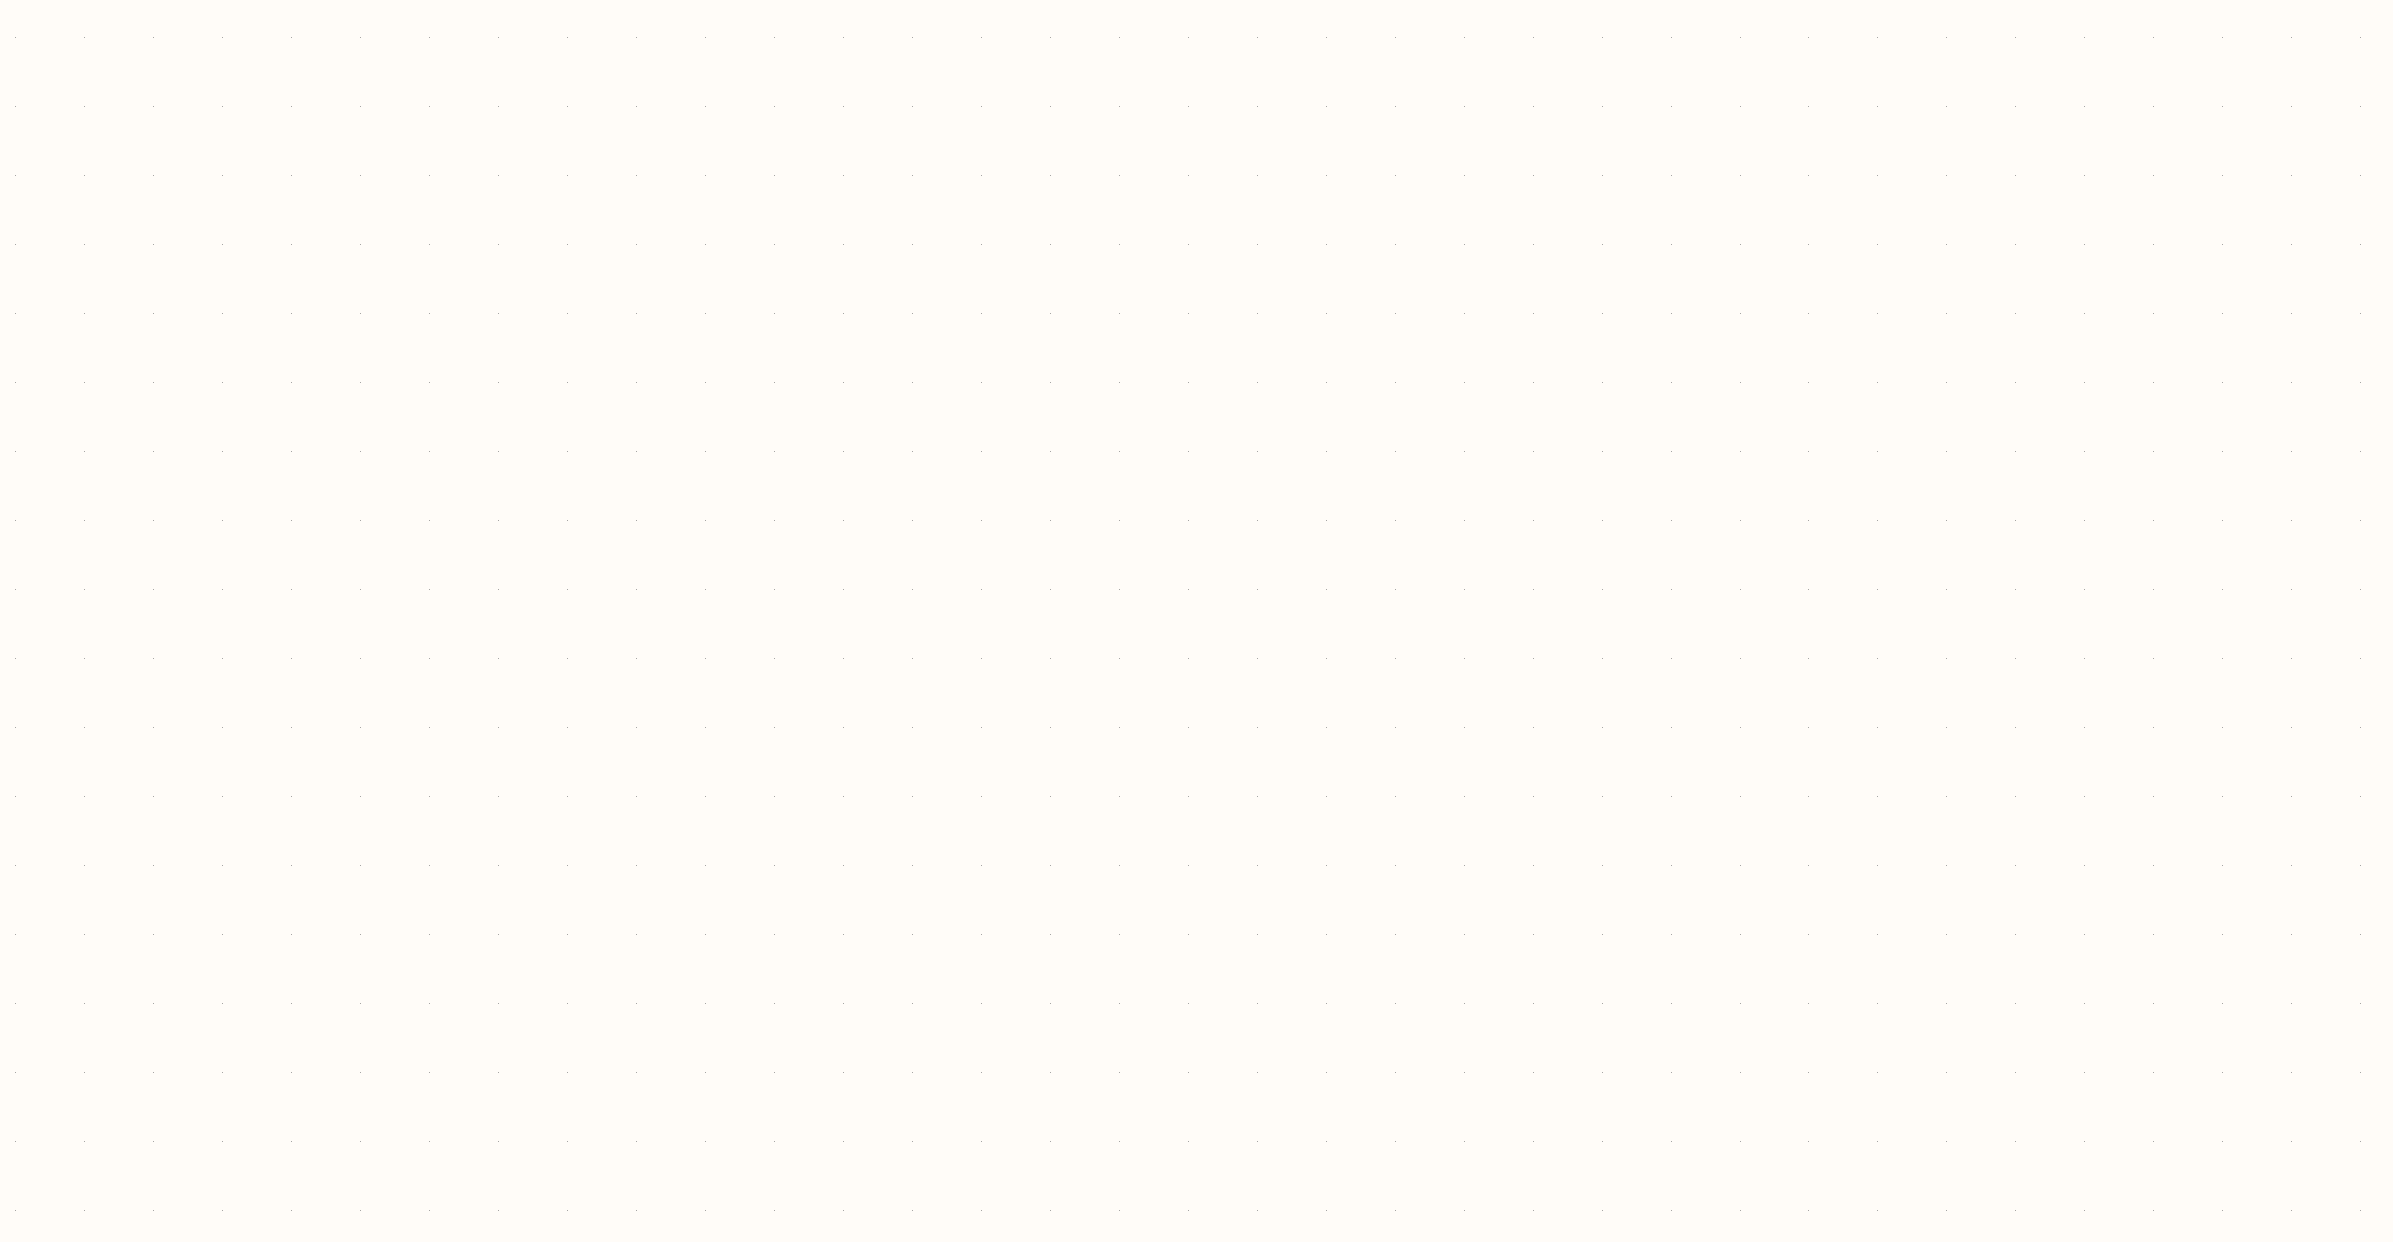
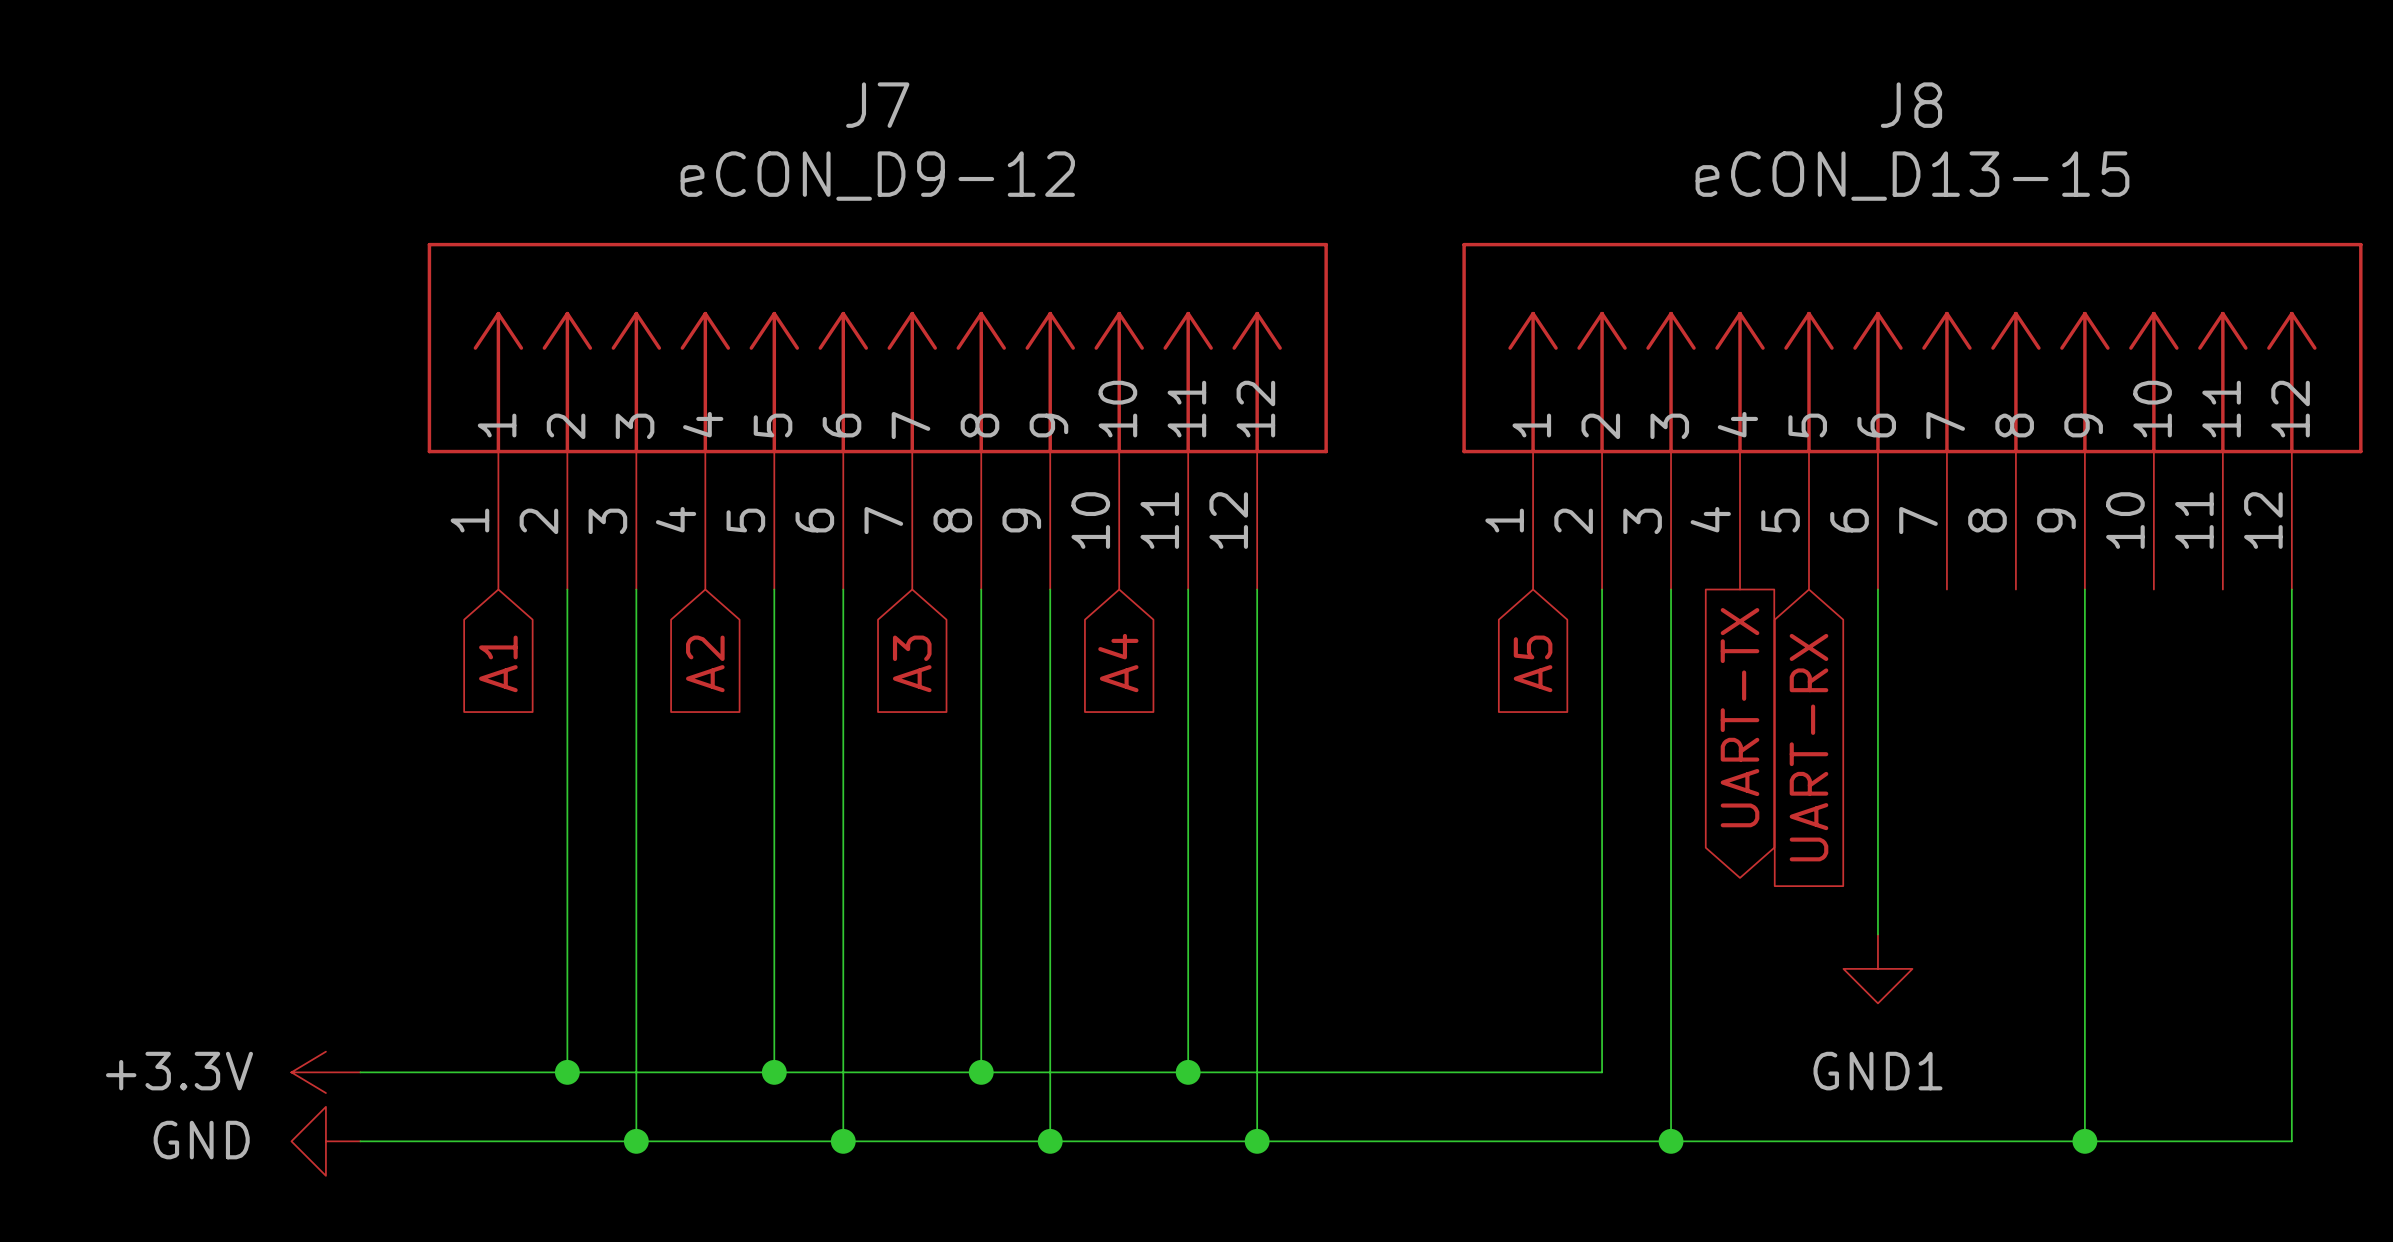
J7: none -> eCON_D9-12 (877, 416)
J8: none -> eCON_D13-15 (1912, 416)
wire: none -> (567, 589) (567, 1072)
wire: none -> (636, 589) (636, 1141)
wire: none -> (774, 589) (774, 1072)
wire: none -> (843, 589) (843, 1141)
wire: none -> (981, 589) (981, 1072)
wire: none -> (1050, 589) (1050, 1141)
wire: none -> (1188, 589) (1188, 1072)
wire: none -> (1257, 589) (1257, 1141)
wire: none -> (1602, 589) (1602, 1072) (360, 1072)
wire: none -> (1671, 589) (1671, 1141)
wire: none -> (1877, 589) (1877, 934)
wire: none -> (2084, 589) (2084, 1141)
wire: none -> (2291, 589) (2291, 1141) (360, 1141)
global label: none -> A1 (498, 663)
global label: none -> A2 (705, 663)
global label: none -> A3 (912, 663)
global label: none -> A4 (1118, 663)
global label: none -> A5 (1533, 663)
global label: none -> UART-TX (1740, 717)
global label: none -> UART-RX (1808, 747)
power symbol: none -> GND1 (1877, 968)
power symbol: none -> +3.3V (325, 1072)
junction: none -> (567, 1072)
junction: none -> (774, 1072)
junction: none -> (981, 1072)
junction: none -> (1188, 1072)
power symbol: none -> GND (325, 1141)
junction: none -> (636, 1141)
junction: none -> (843, 1141)
junction: none -> (1050, 1141)
junction: none -> (1257, 1141)
junction: none -> (1671, 1141)
junction: none -> (2084, 1141)

